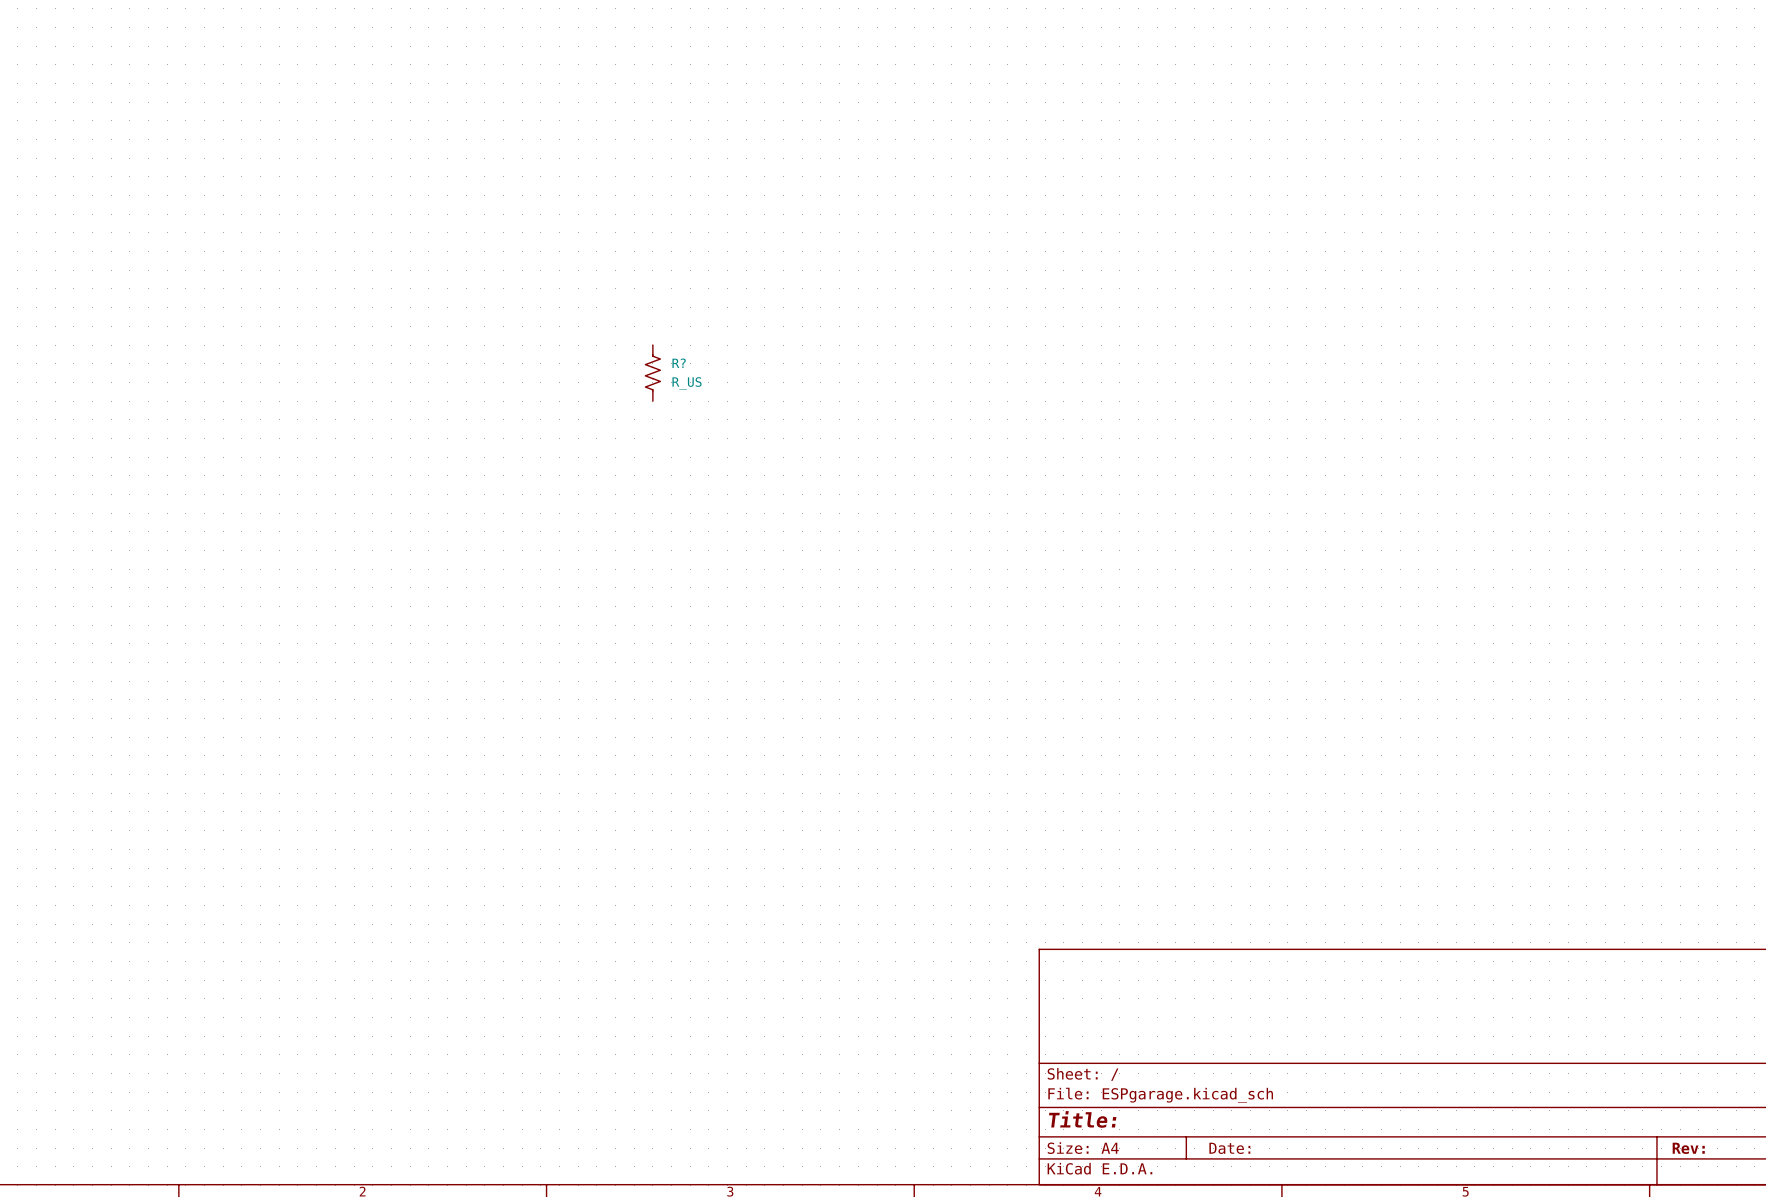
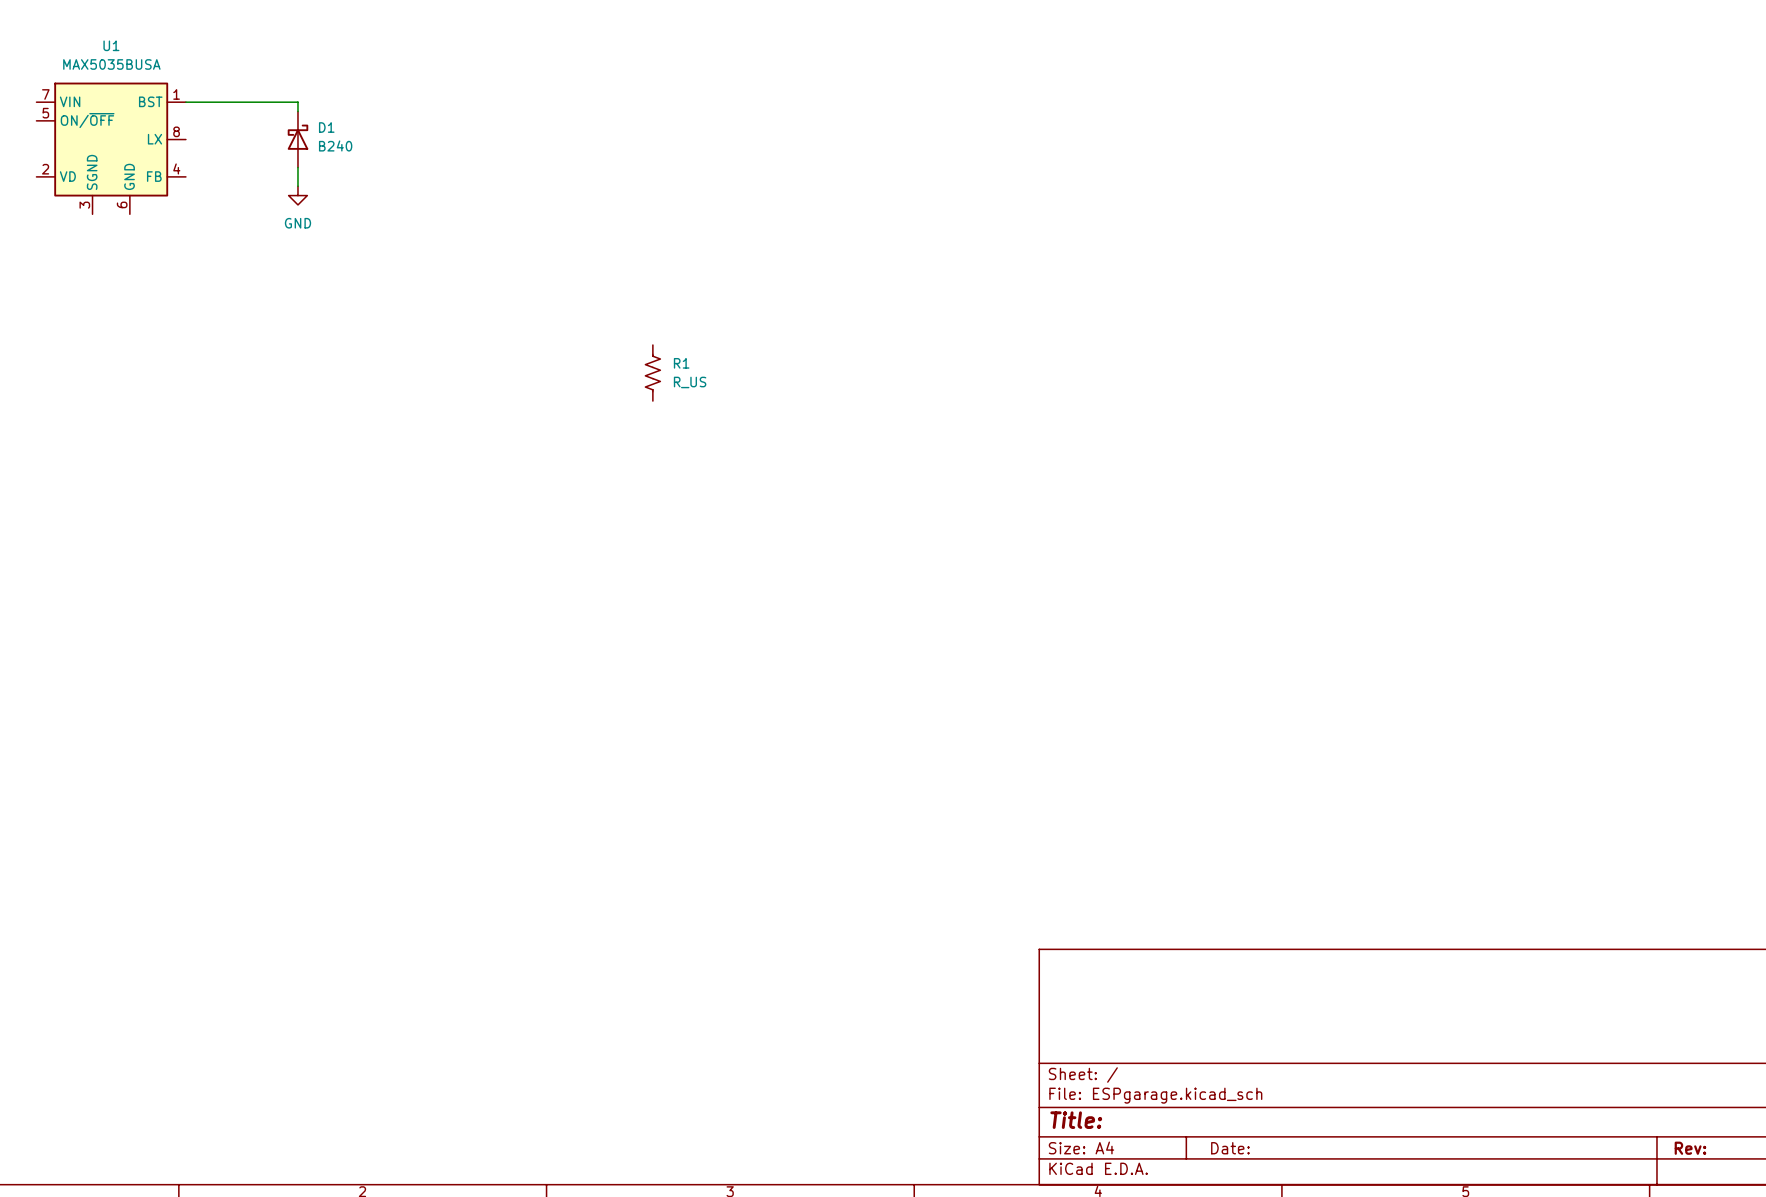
wire: none -> (185, 102) (297, 102) (297, 111)
D1: none -> B240 (297, 139)
U1: none -> MAX5035BUSA (111, 148)
wire: none -> (297, 167) (297, 186)
power symbol: none -> GND (297, 195)
R? name: R? (679, 363) -> R1 (681, 363)

